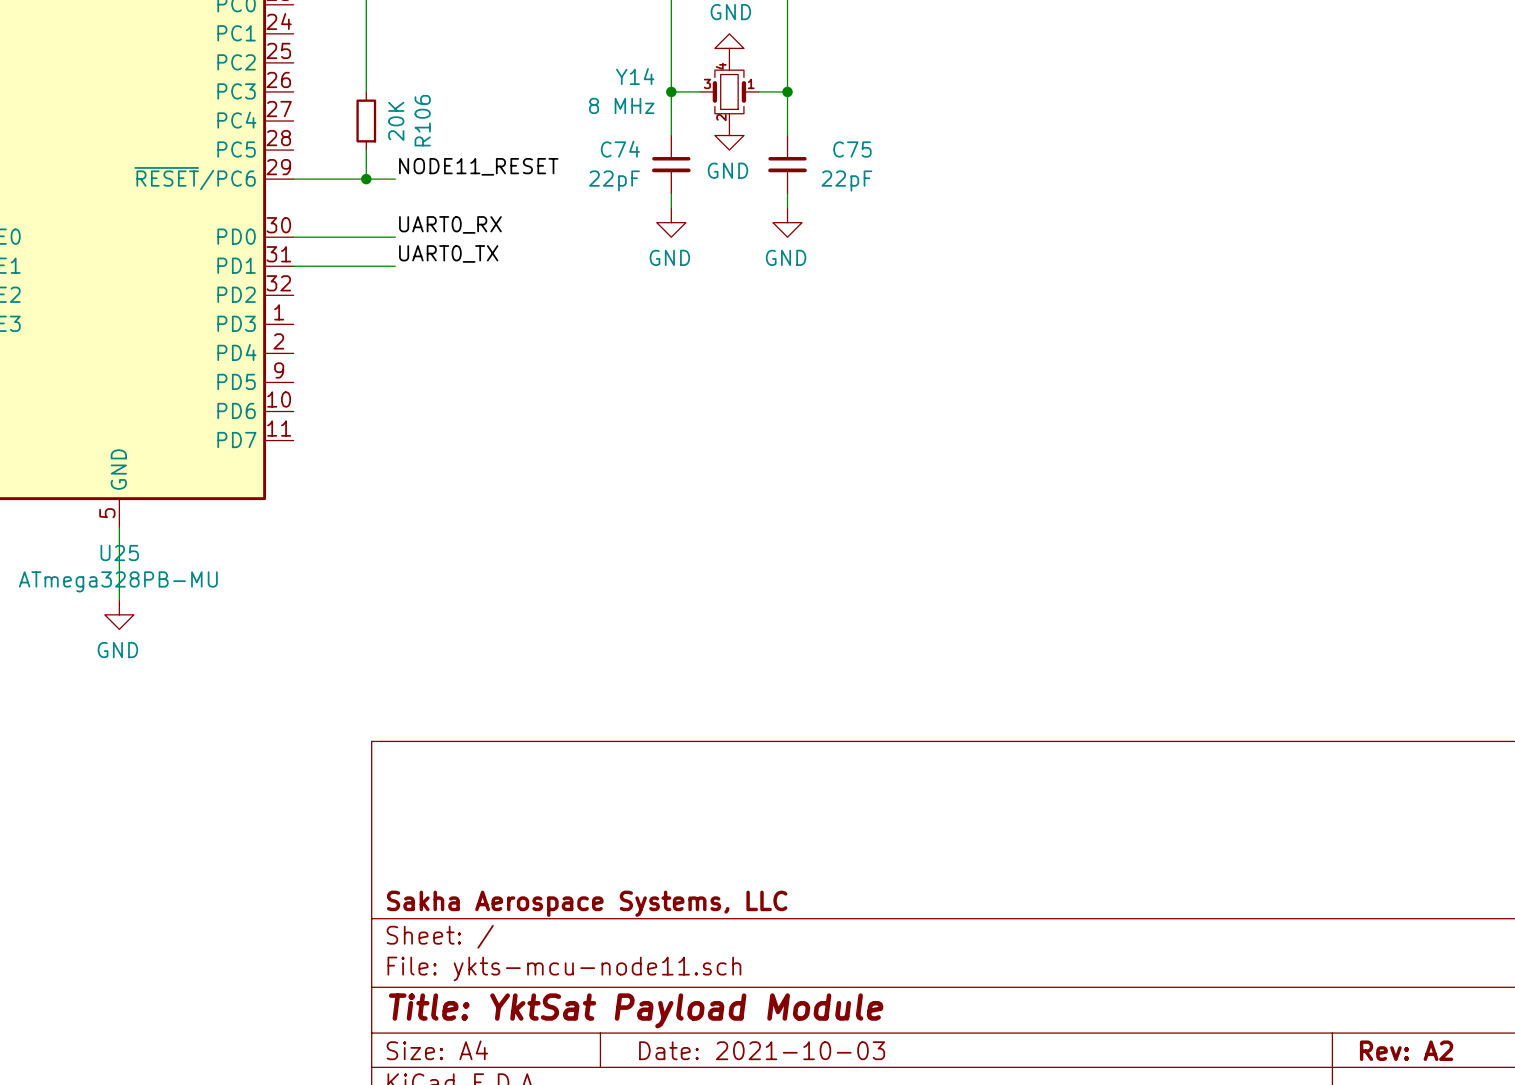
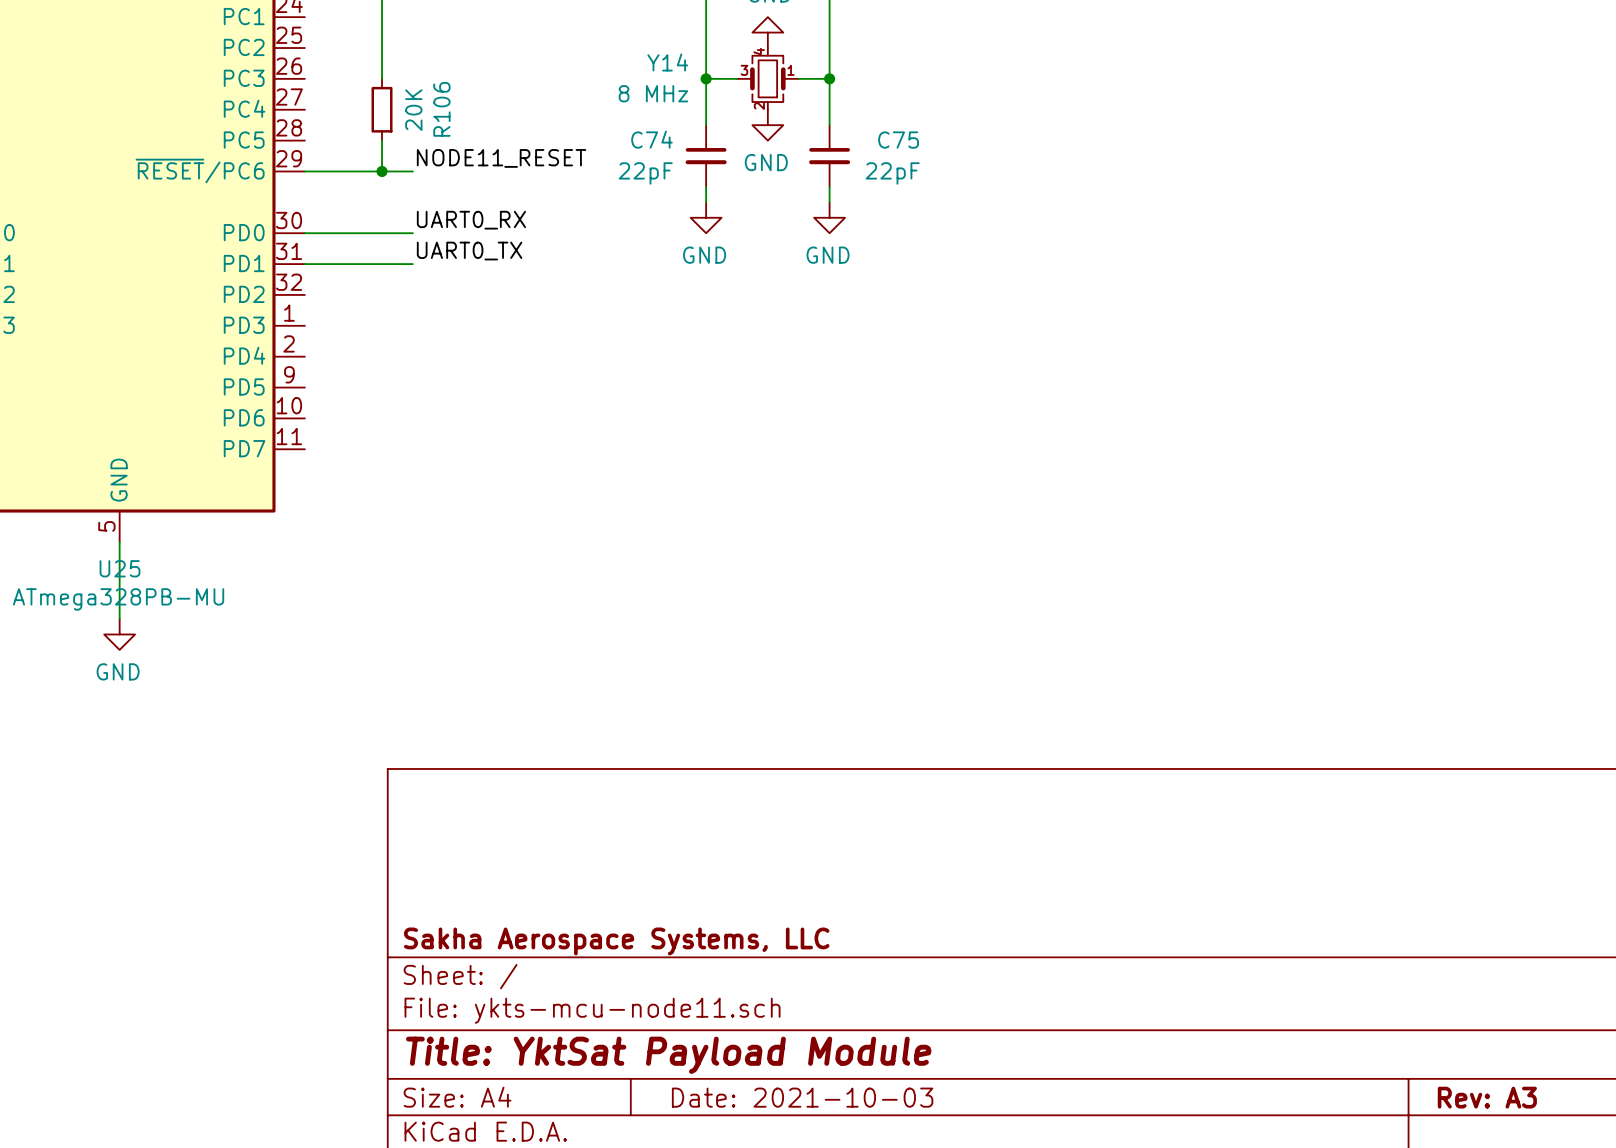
title block: Rev: A2 (1406, 1050) -> Rev: A3 (1487, 1097)

